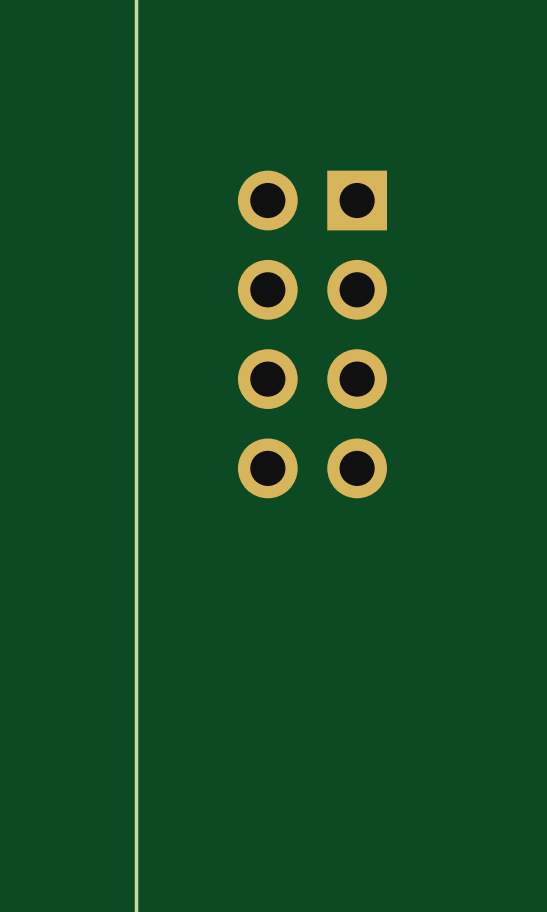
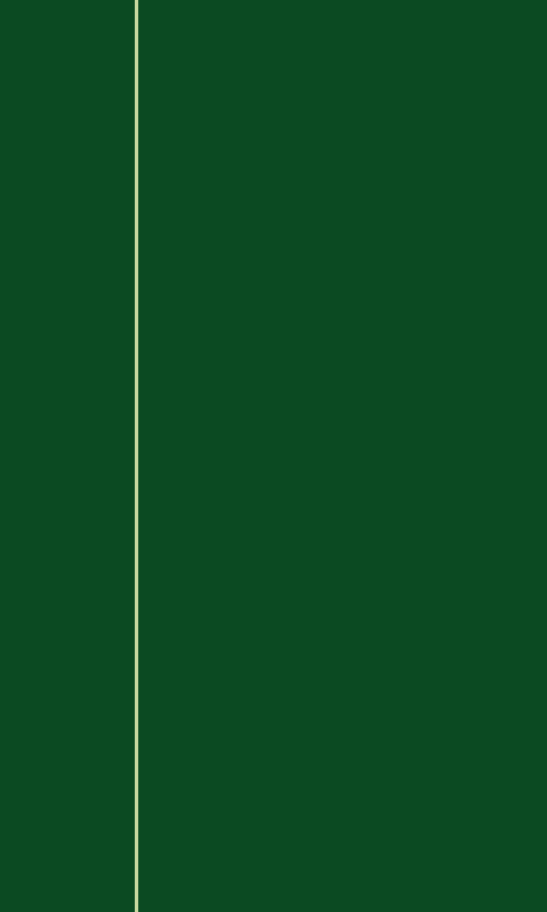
part: (312, 334) -> none

